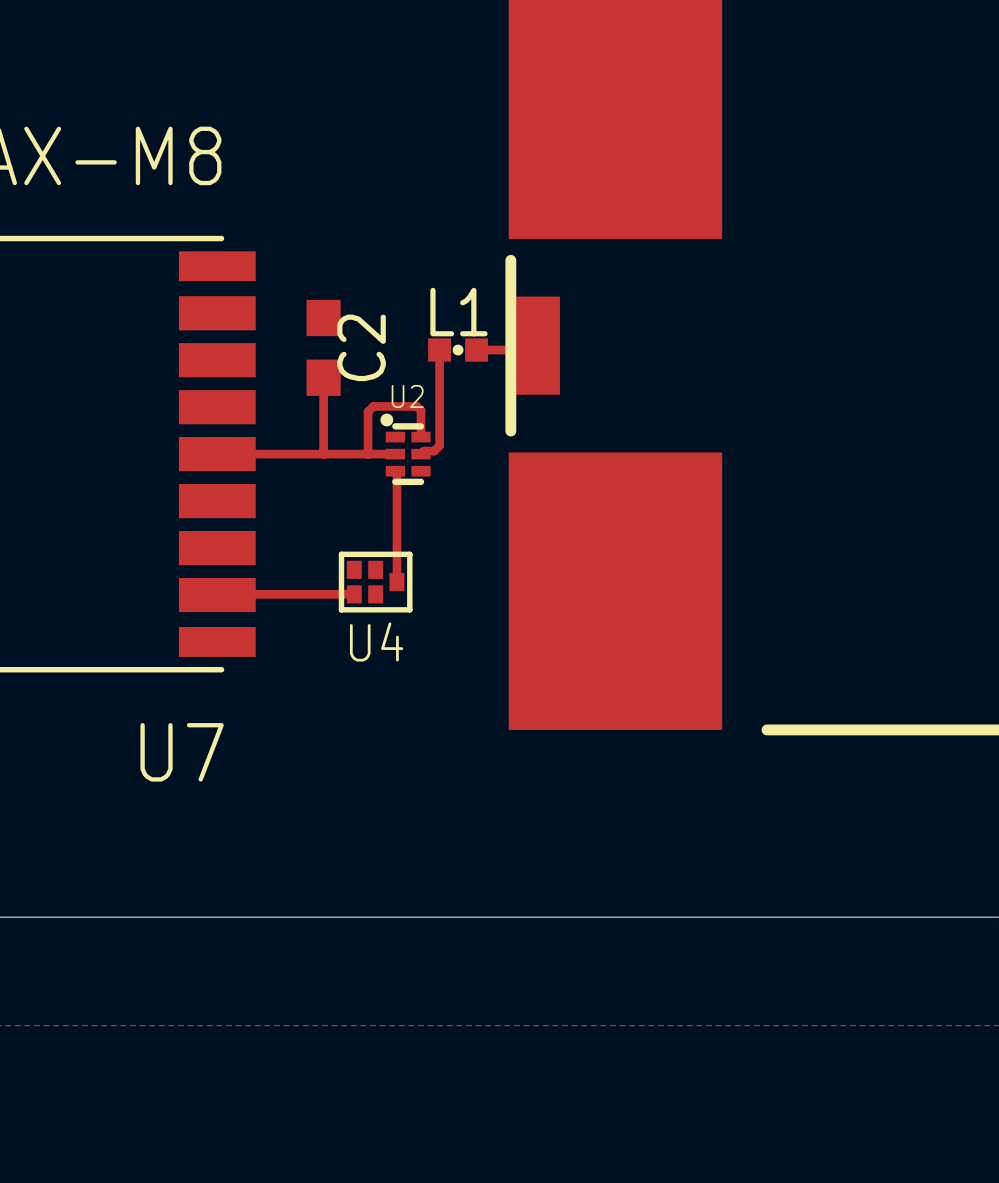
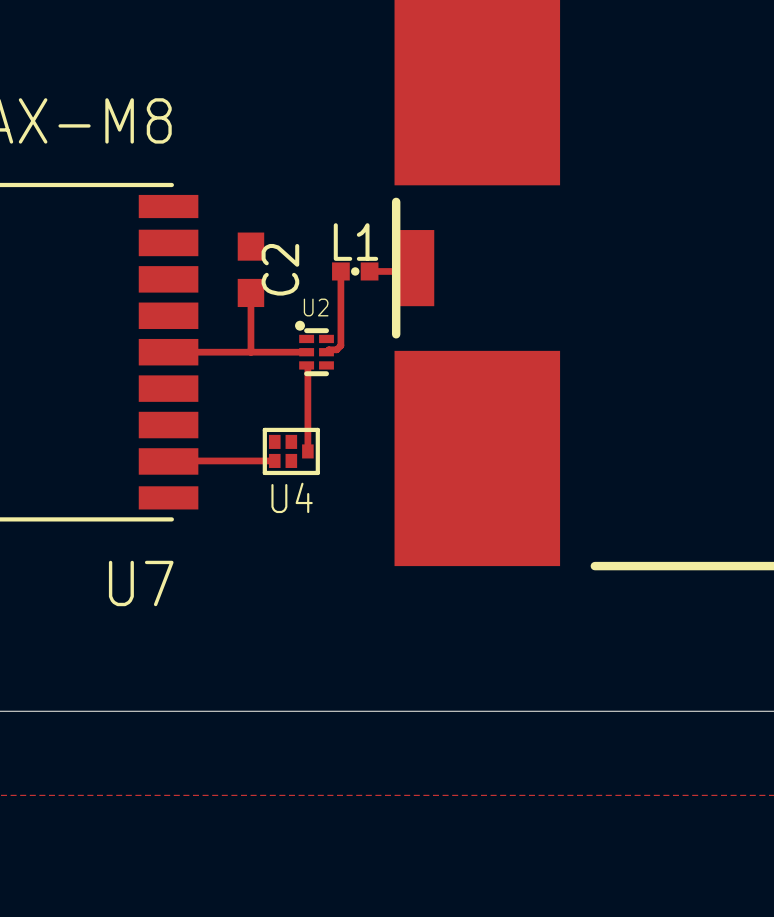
top track: (420, 437) (420, 410) (416, 406) (373, 406) (368, 411) (368, 454) -> none

